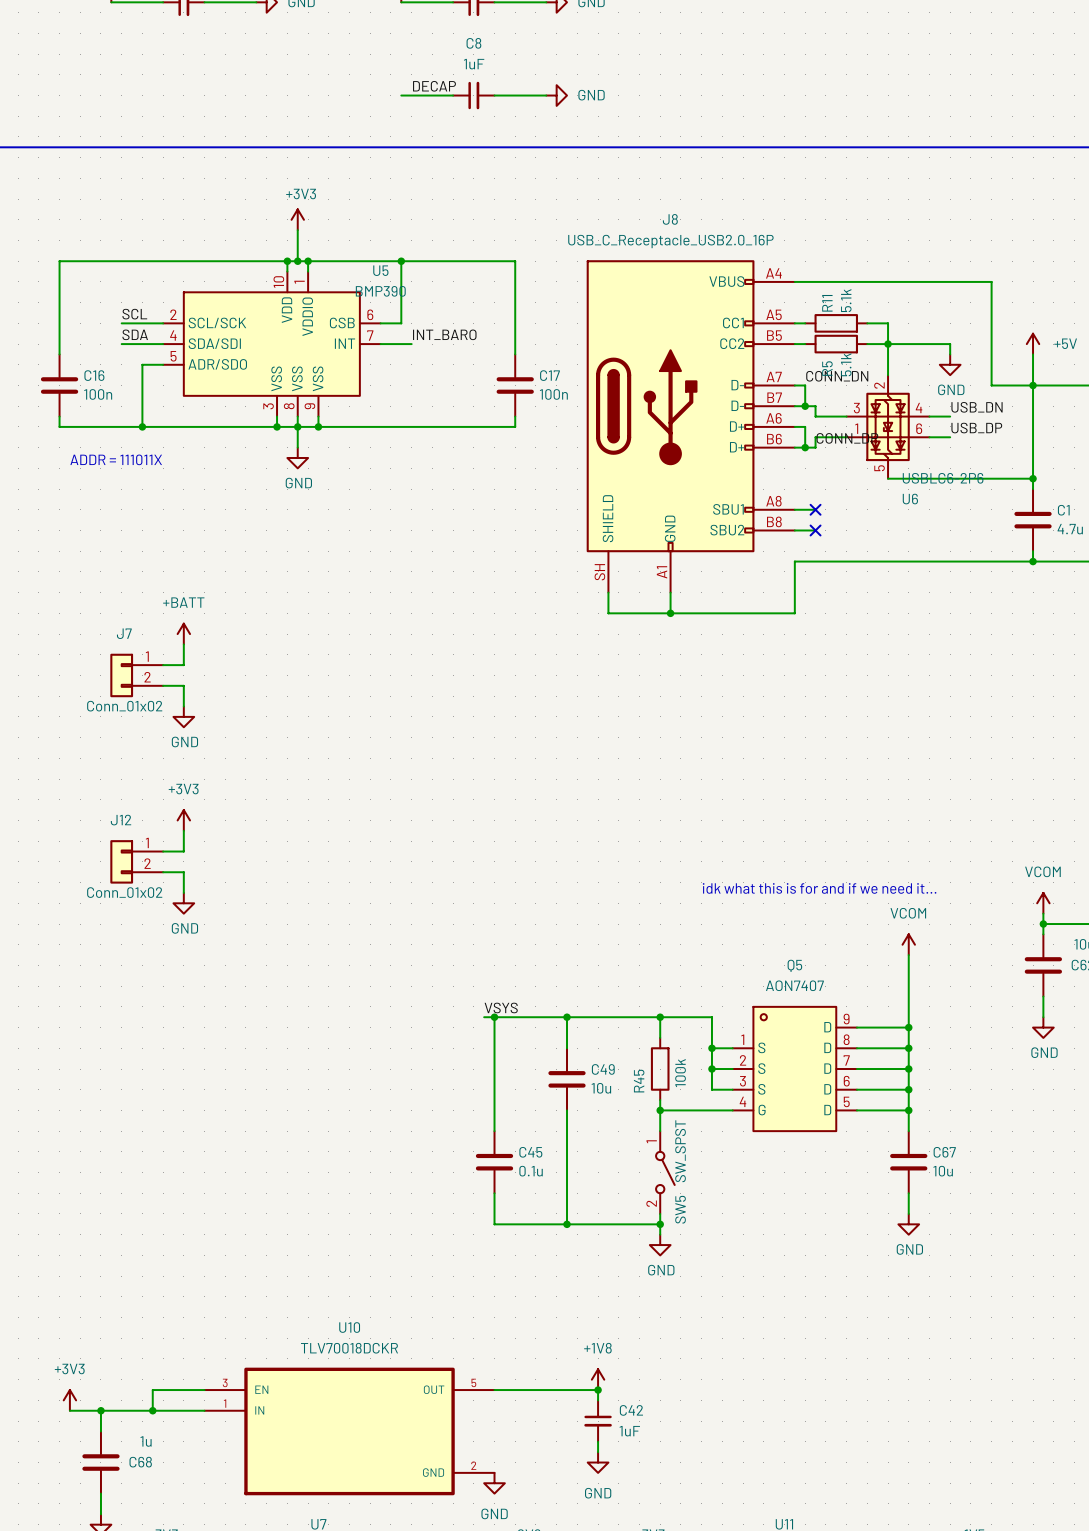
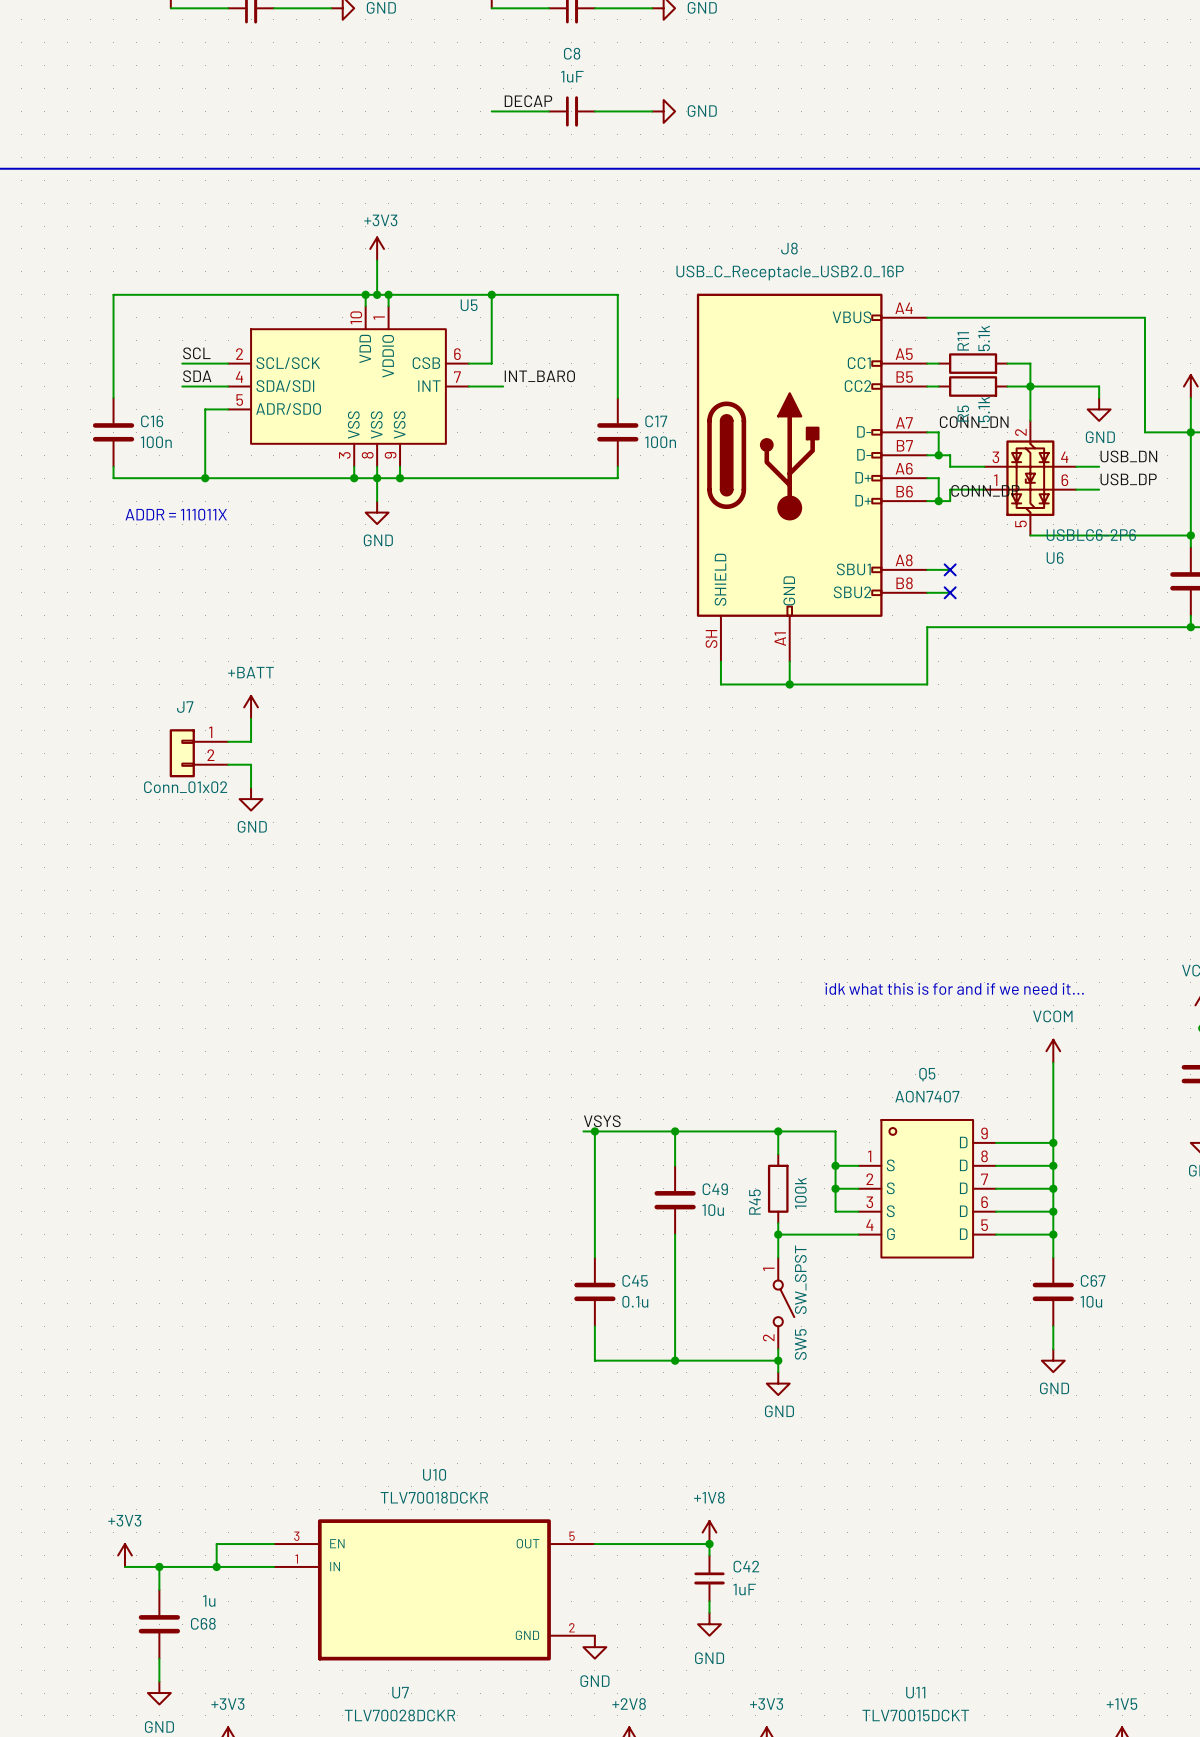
U5 value: BMP390 (380, 291) -> none
power symbol: +3V3 (183, 820) -> none
wire: (183, 830) (183, 851) (163, 851) -> none
J12: Conn_01x02 (136, 861) -> none
wire: (163, 872) (183, 872) (183, 892) -> none
power symbol: GND (183, 903) -> none

